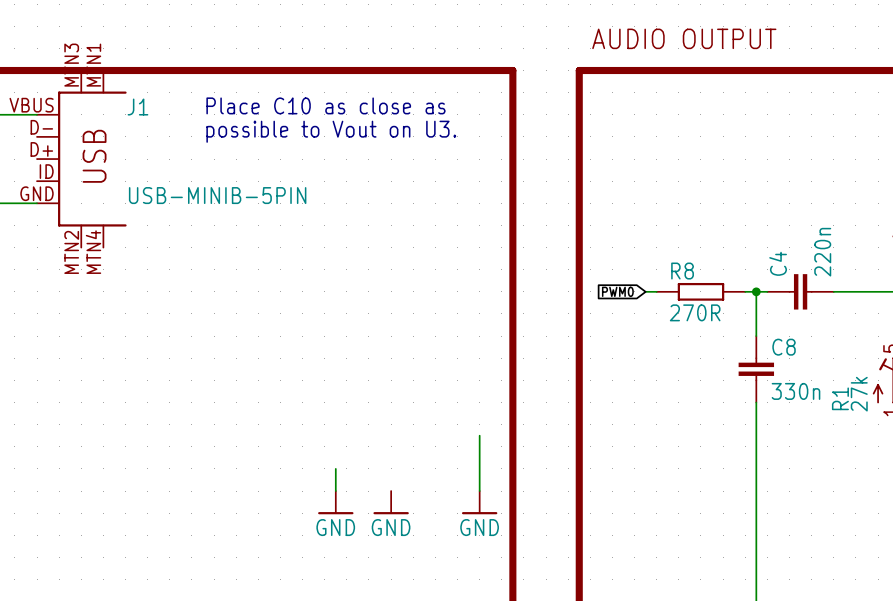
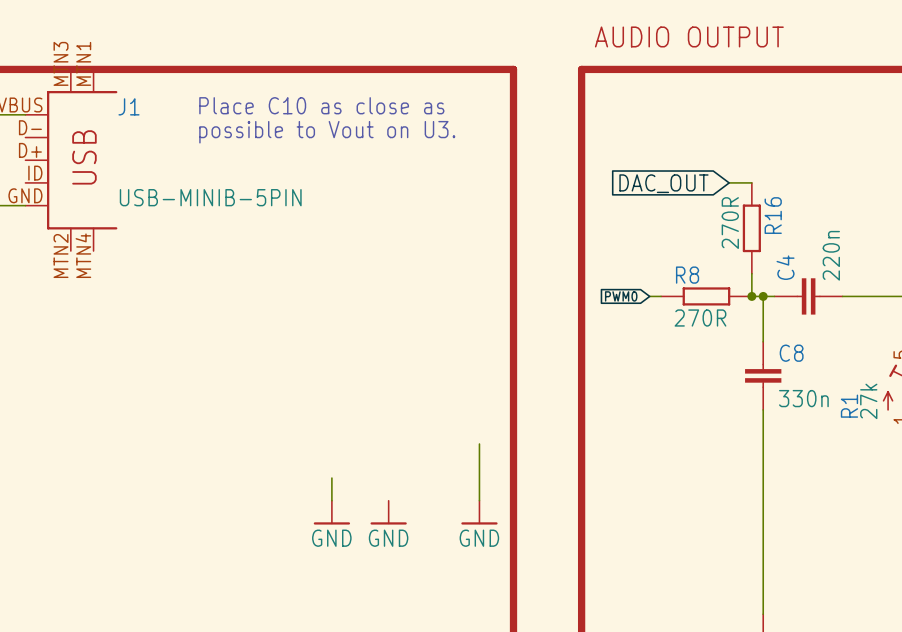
global label: none -> DAC_OUT (663, 183)
wire: none -> (729, 182) (751, 182)
R16: none -> 270R (751, 228)
wire: none -> (751, 273) (751, 296)
junction: none -> (751, 296)

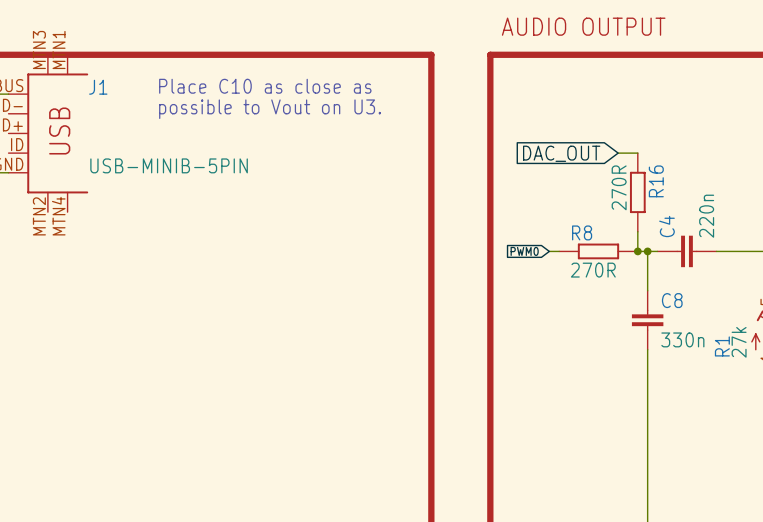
wire: (479, 443) (479, 500) -> none
wire: (331, 478) (331, 500) -> none
power symbol: GND (331, 512) -> none
power symbol: GND (388, 512) -> none
power symbol: GND (479, 512) -> none

